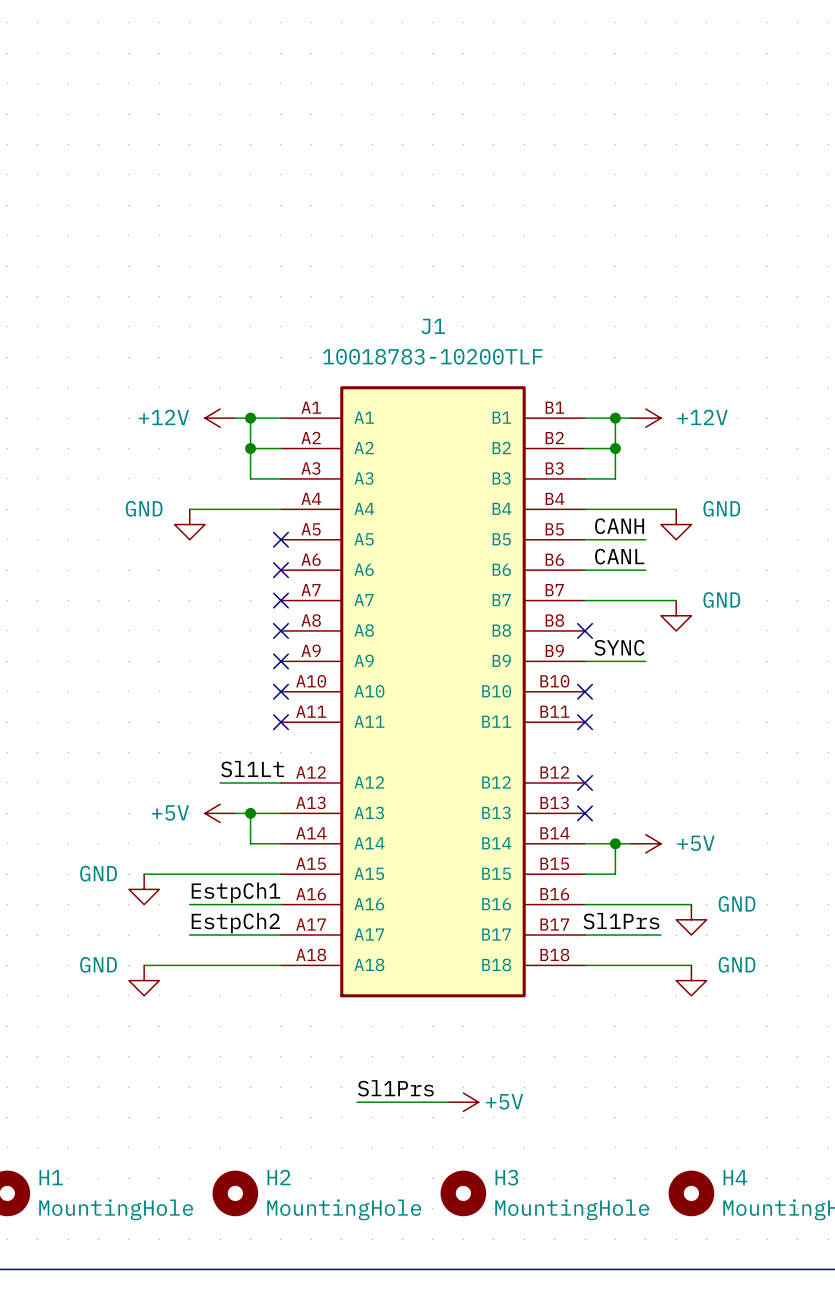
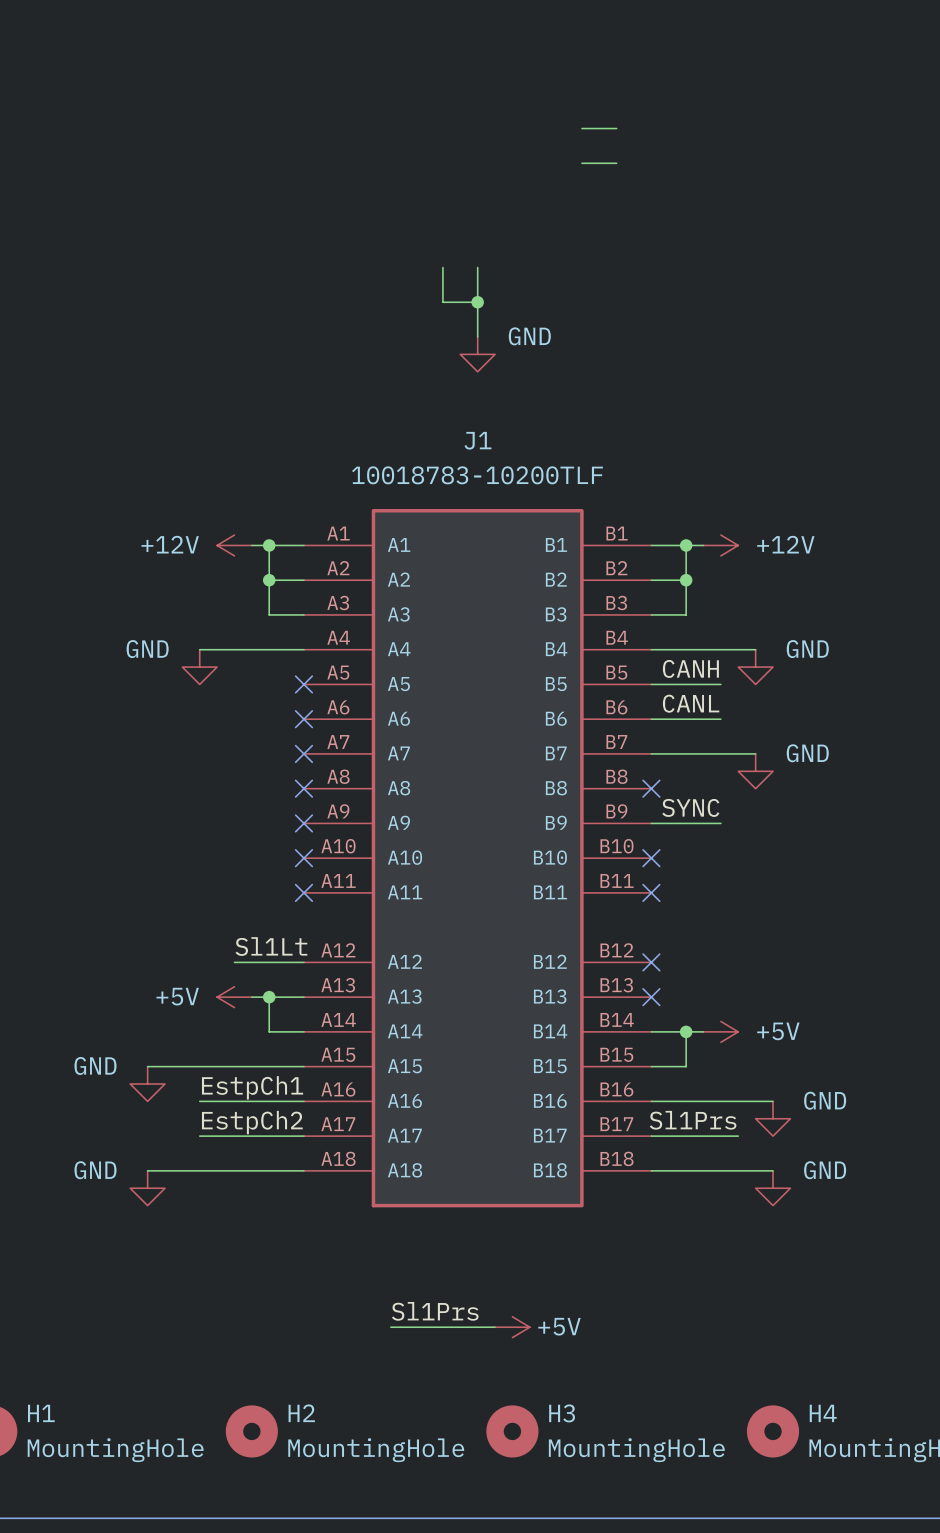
wire: none -> (581, 128) (616, 128)
wire: none -> (581, 163) (616, 163)
wire: none -> (442, 267) (442, 302) (477, 302)
wire: none -> (477, 267) (477, 337)
junction: none -> (477, 302)
power symbol: none -> GND (477, 354)

